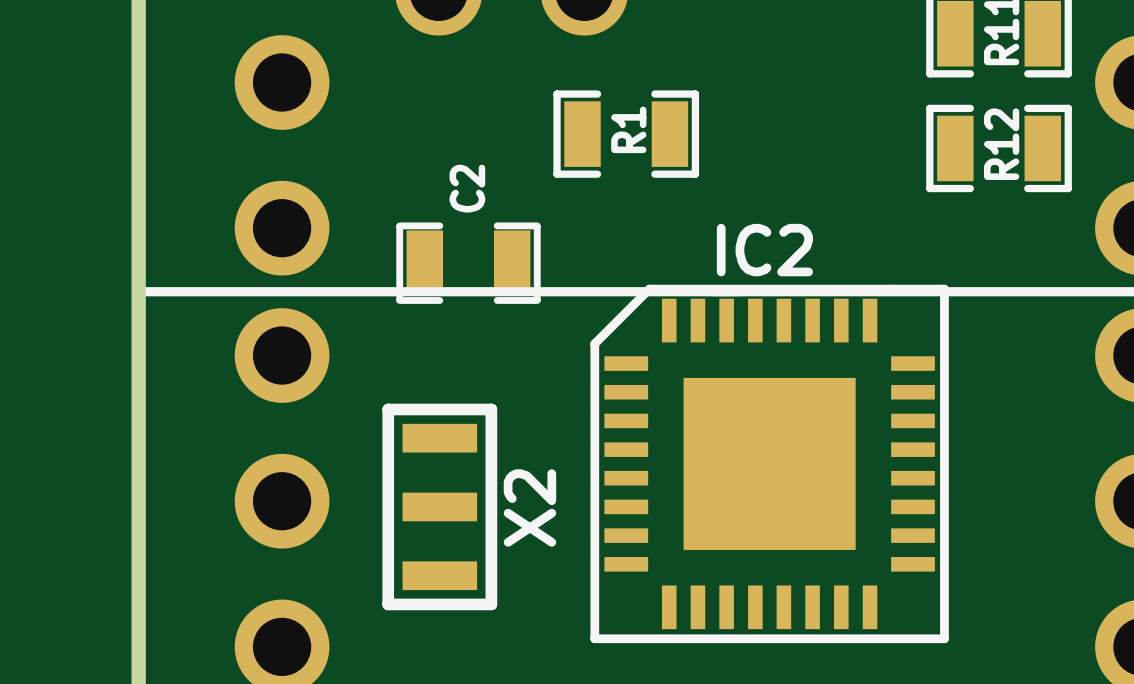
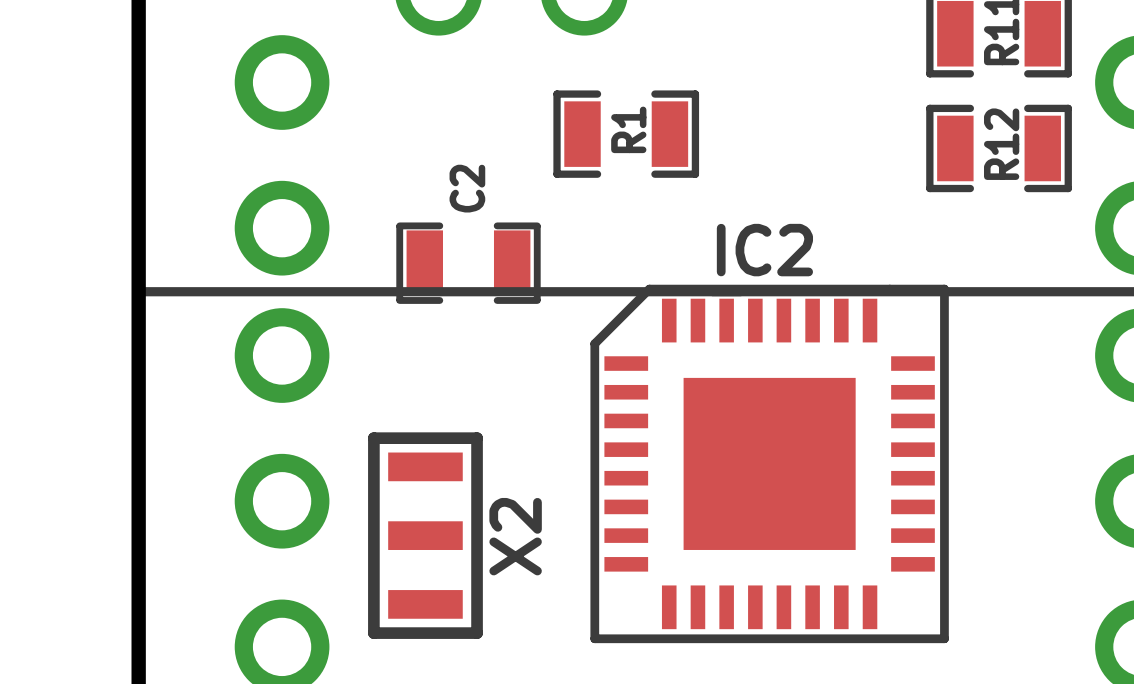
X2 position: (439, 506) -> (425, 535)

